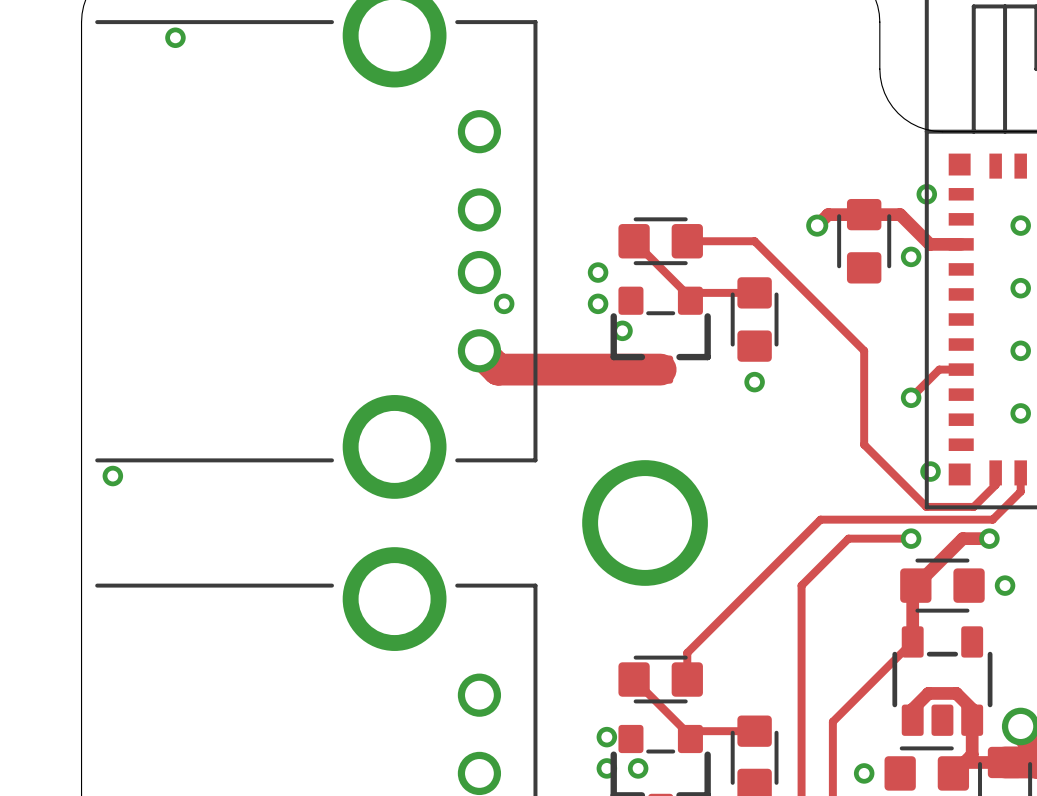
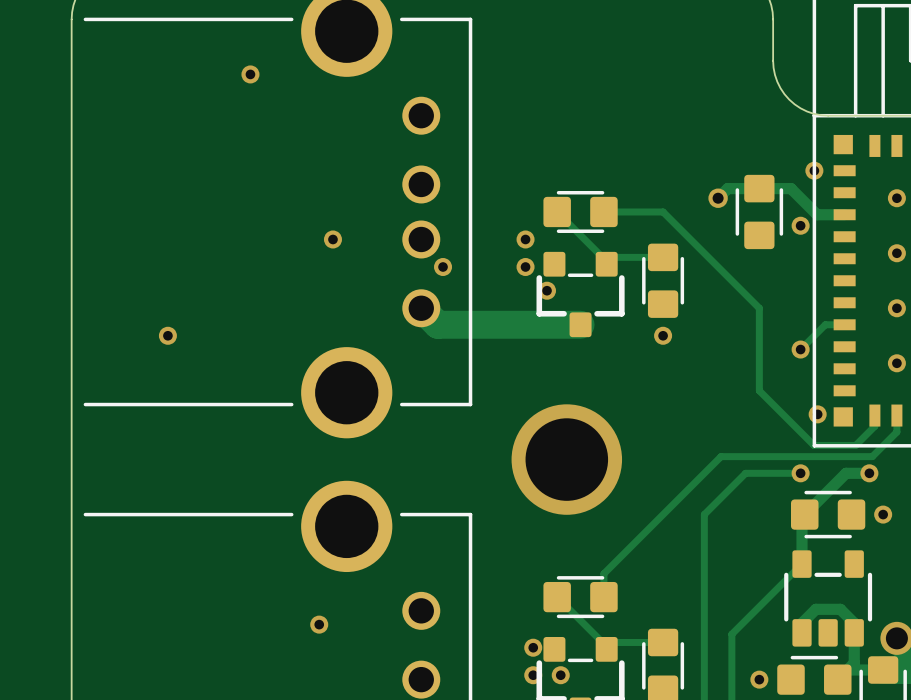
via position: (175, 37) -> (250, 74)
via: none -> (332, 239)
via position: (112, 476) -> (167, 335)
via: none -> (319, 624)

